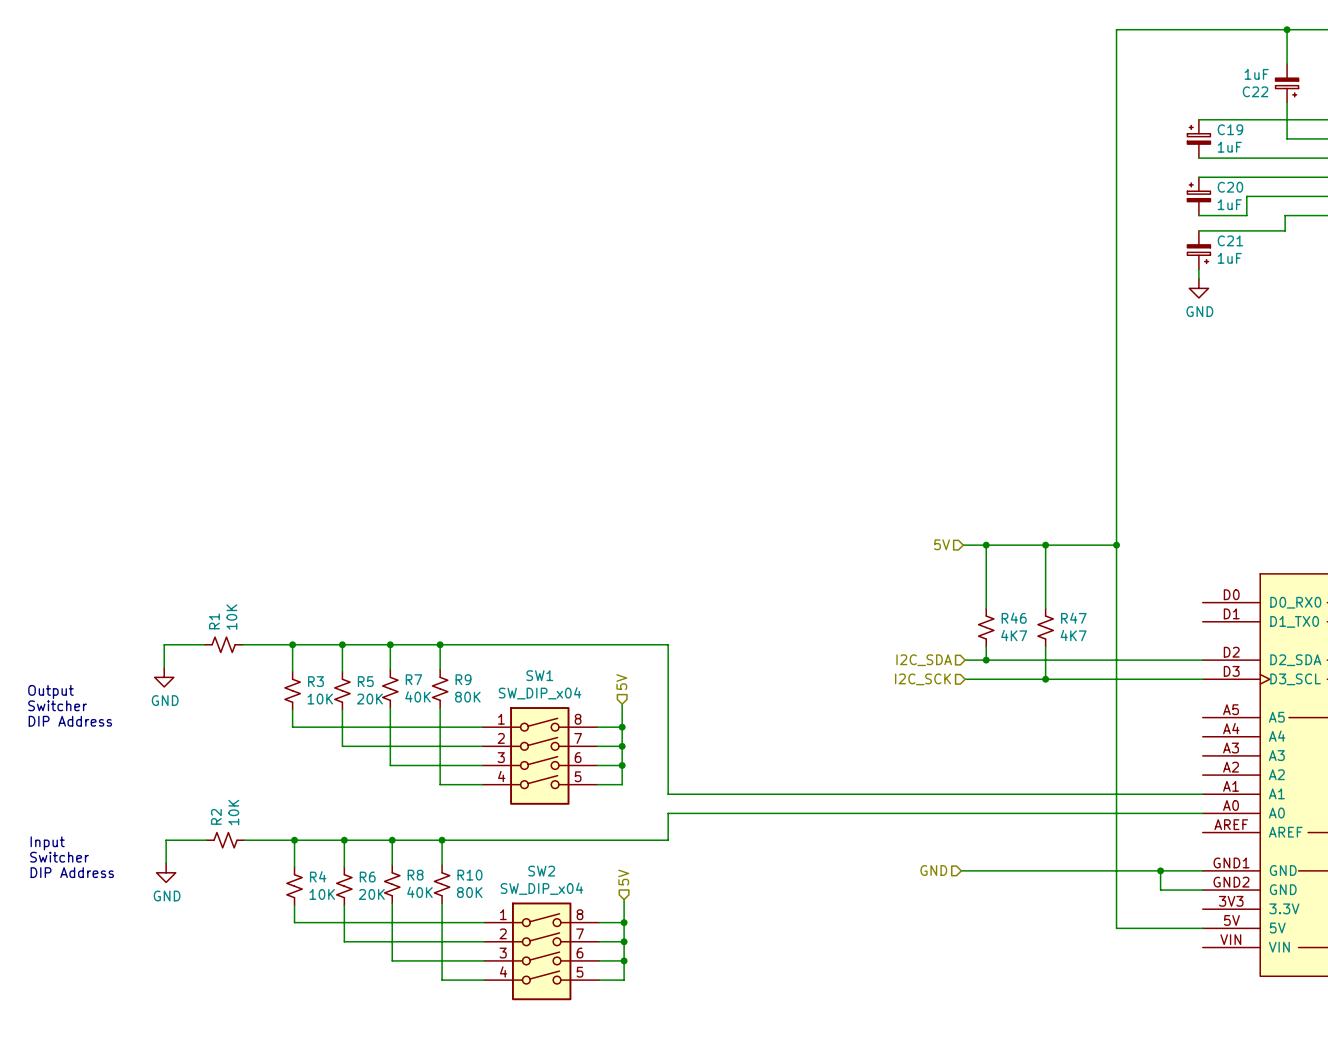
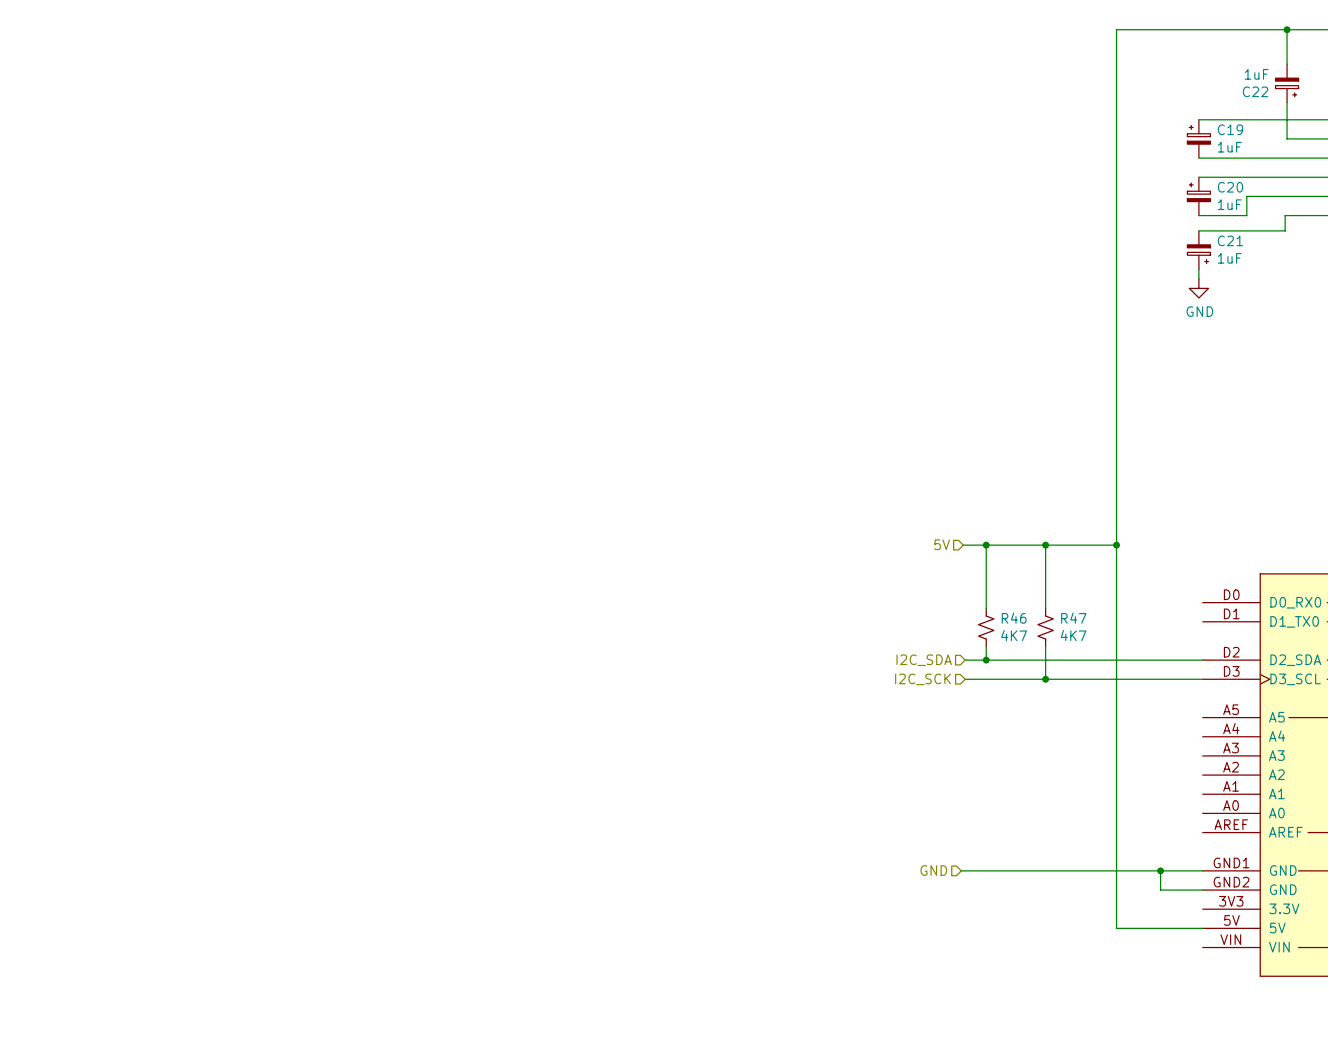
wire: (204, 644) (164, 644) (164, 667) -> none
R1: 10K (223, 644) -> none
wire: (242, 644) (668, 644) (668, 794) (1202, 794) -> none
wire: (292, 644) (292, 671) -> none
junction: (292, 644) -> none
wire: (342, 644) (342, 671) -> none
junction: (342, 644) -> none
wire: (390, 644) (390, 669) -> none
junction: (390, 644) -> none
wire: (440, 644) (440, 669) -> none
junction: (440, 644) -> none
power symbol: GND (164, 677) -> none
hierarchical label: 5V (621, 682) -> none
R7: 40K (390, 688) -> none
R9: 80K (440, 688) -> none
R3: 10K (292, 690) -> none
R5: 20K (342, 690) -> none
text: Output (50, 691) -> none
wire: (622, 704) (622, 784) (597, 784) -> none
text: Switcher (57, 705) -> none
wire: (390, 708) (390, 765) (482, 765) -> none
wire: (440, 708) (440, 784) (482, 784) -> none
wire: (292, 709) (292, 727) (482, 727) -> none
wire: (342, 709) (342, 746) (482, 746) -> none
text: DIP Address (70, 721) -> none
wire: (597, 727) (622, 727) -> none
junction: (622, 727) -> none
wire: (597, 746) (622, 746) -> none
junction: (622, 746) -> none
SW1: SW_DIP_x04 (539, 755) -> none
wire: (597, 765) (622, 765) -> none
junction: (622, 765) -> none
wire: (1202, 813) (668, 813) (668, 840) (244, 840) -> none
wire: (206, 840) (166, 840) (166, 863) -> none
R2: 10K (225, 840) -> none
wire: (294, 840) (294, 867) -> none
junction: (294, 840) -> none
wire: (344, 840) (344, 867) -> none
junction: (344, 840) -> none
wire: (392, 840) (392, 865) -> none
junction: (392, 840) -> none
wire: (442, 840) (442, 865) -> none
junction: (442, 840) -> none
text: Input (47, 843) -> none
text: Switcher (59, 857) -> none
text: DIP Address (72, 872) -> none
power symbol: GND (166, 872) -> none
hierarchical label: 5V (623, 877) -> none
R8: 40K (392, 884) -> none
R10: 80K (442, 884) -> none
R4: 10K (294, 886) -> none
R6: 20K (344, 886) -> none
wire: (624, 899) (624, 980) (599, 980) -> none
wire: (392, 903) (392, 960) (484, 960) -> none
wire: (442, 903) (442, 980) (484, 980) -> none
wire: (294, 905) (294, 922) (484, 922) -> none
wire: (344, 905) (344, 941) (484, 941) -> none
wire: (599, 922) (624, 922) -> none
junction: (624, 922) -> none
wire: (599, 941) (624, 941) -> none
junction: (624, 941) -> none
SW2: SW_DIP_x04 (541, 951) -> none
wire: (599, 960) (624, 960) -> none
junction: (624, 960) -> none

